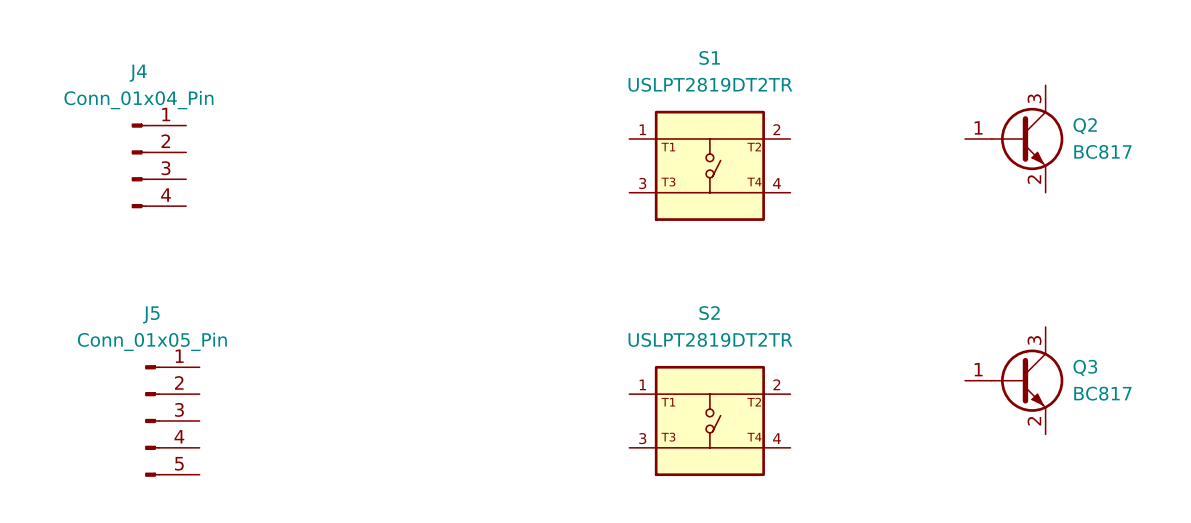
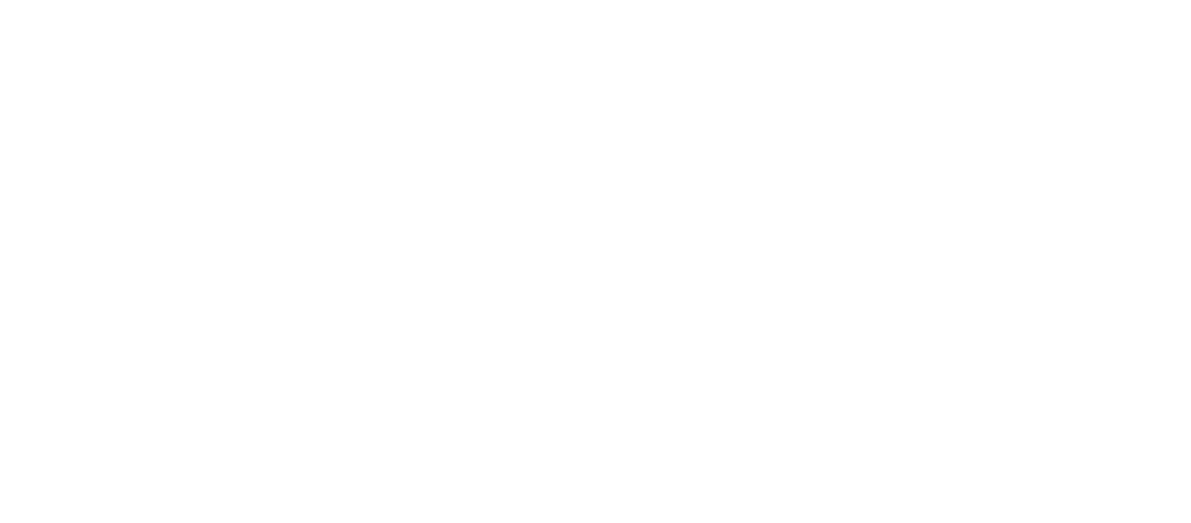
Q2: BC817 (1014, 138) -> none
J4: Conn_01x04_Pin (158, 165) -> none
S1: USLPT2819DT2TR (709, 165) -> none
Q3: BC817 (1014, 380) -> none
J5: Conn_01x05_Pin (172, 420) -> none
S2: USLPT2819DT2TR (709, 420) -> none

